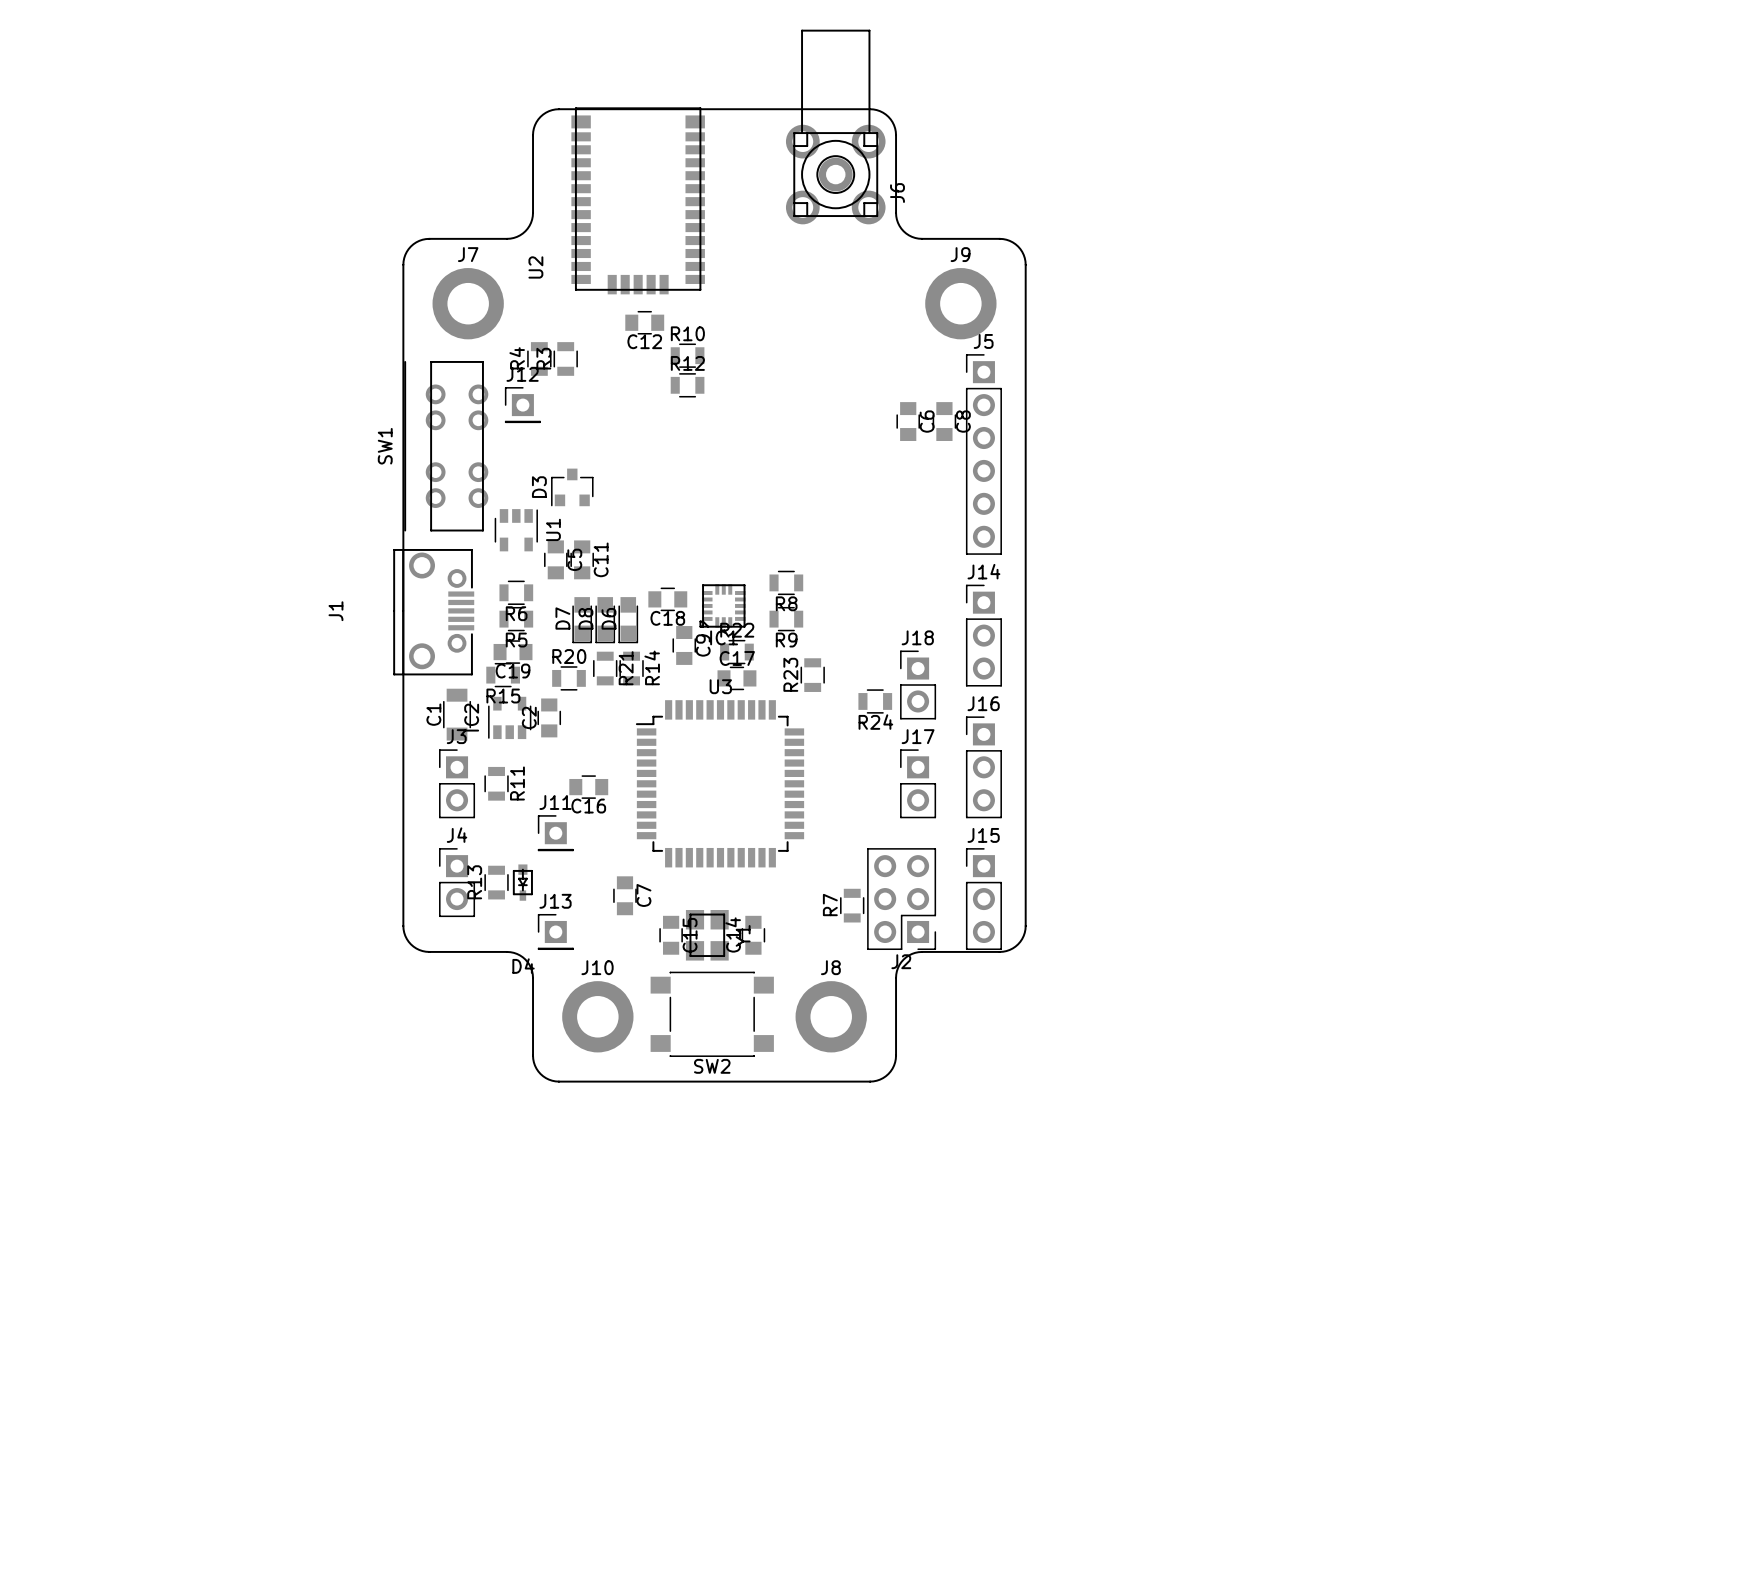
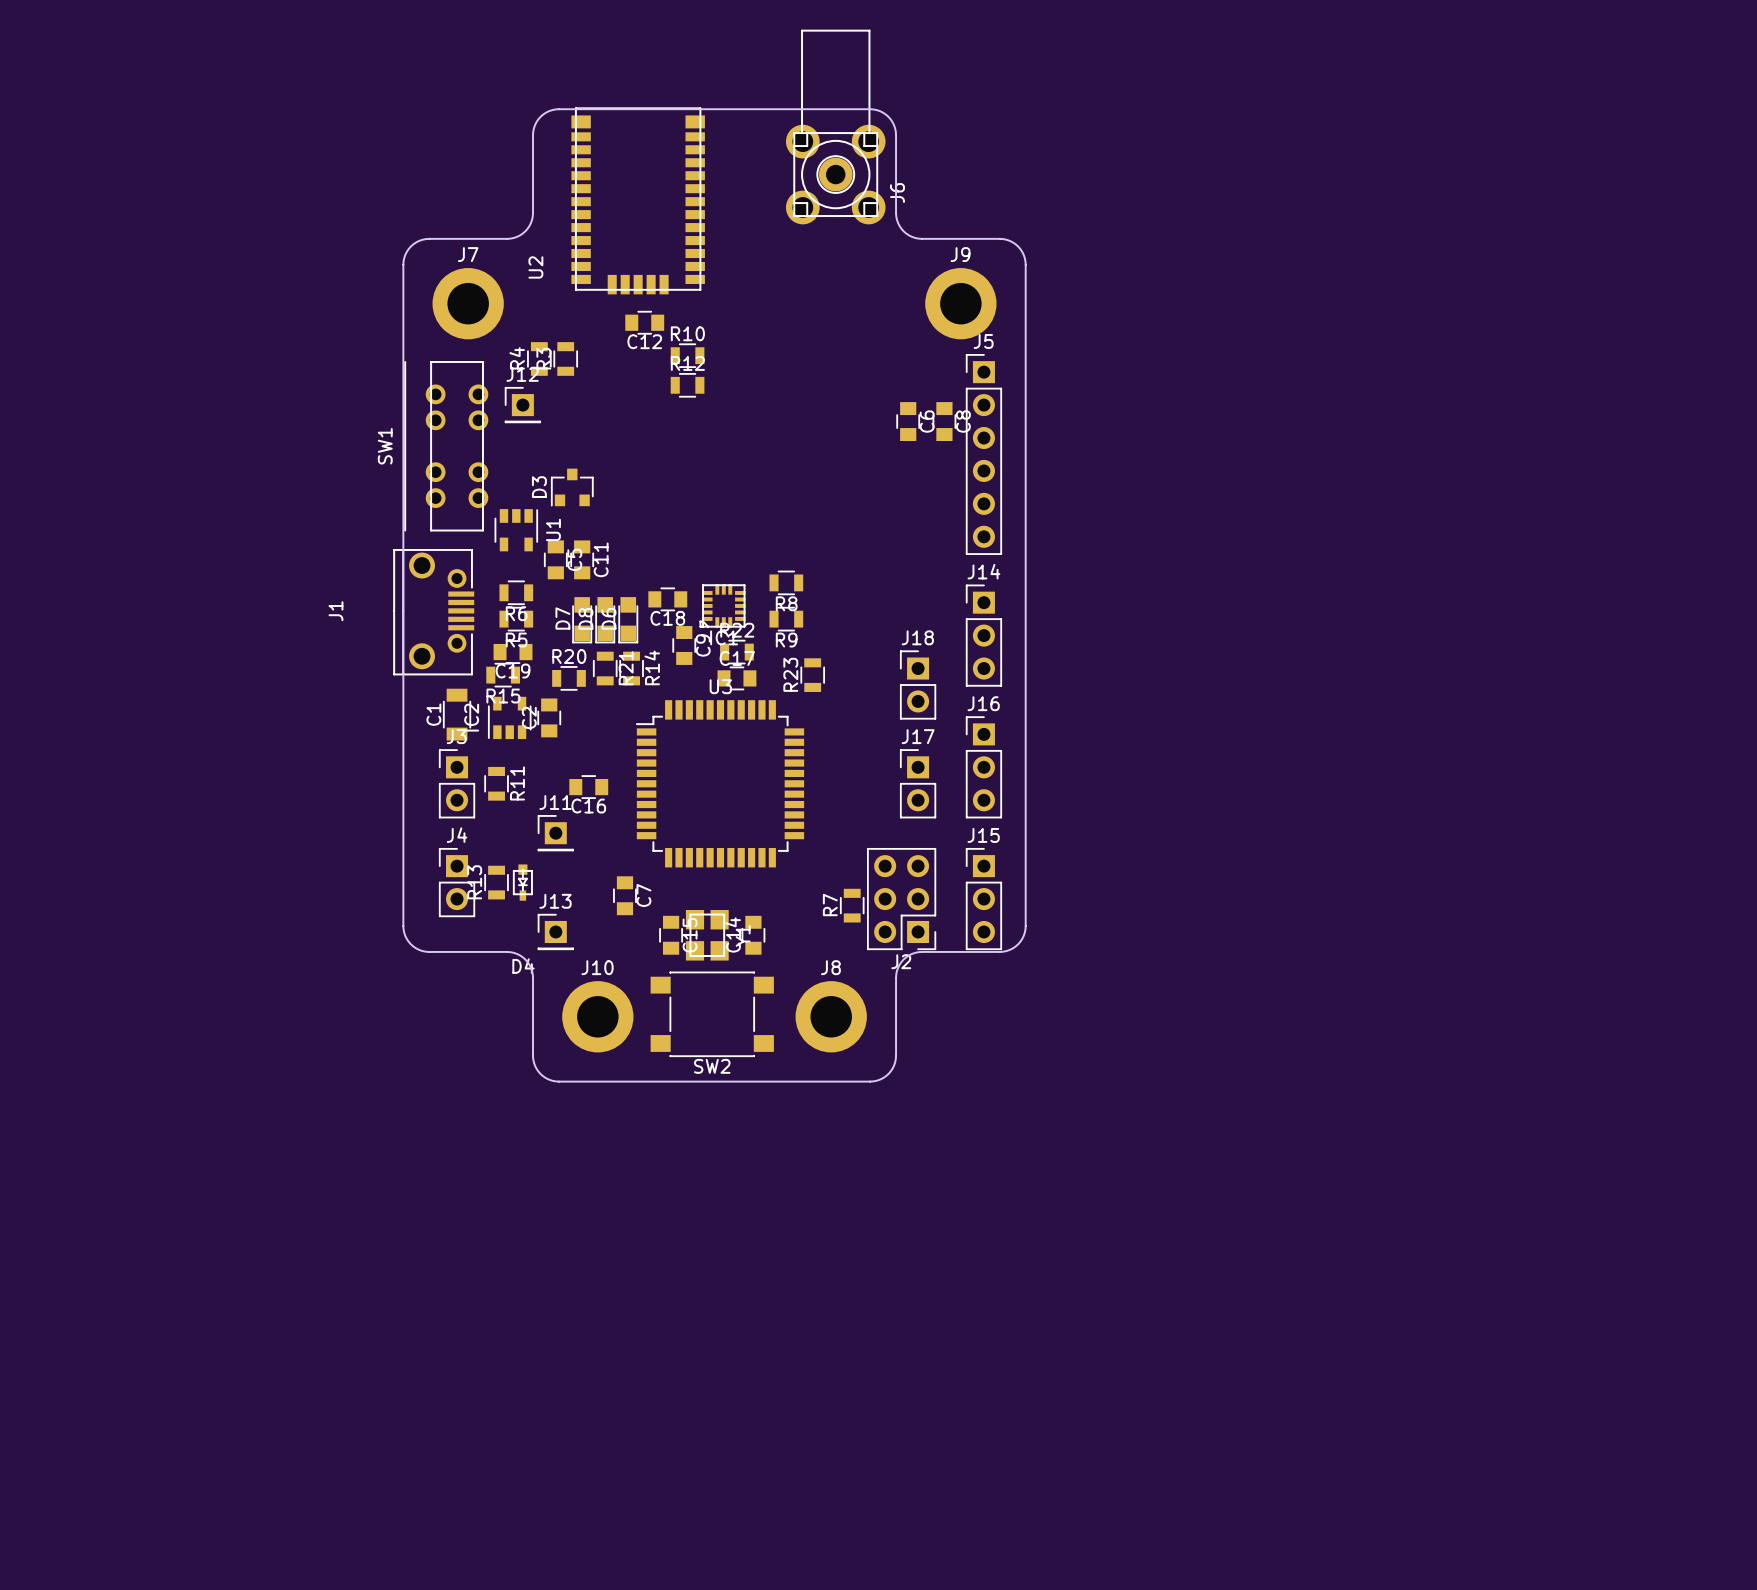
R24: (875, 701) -> none

